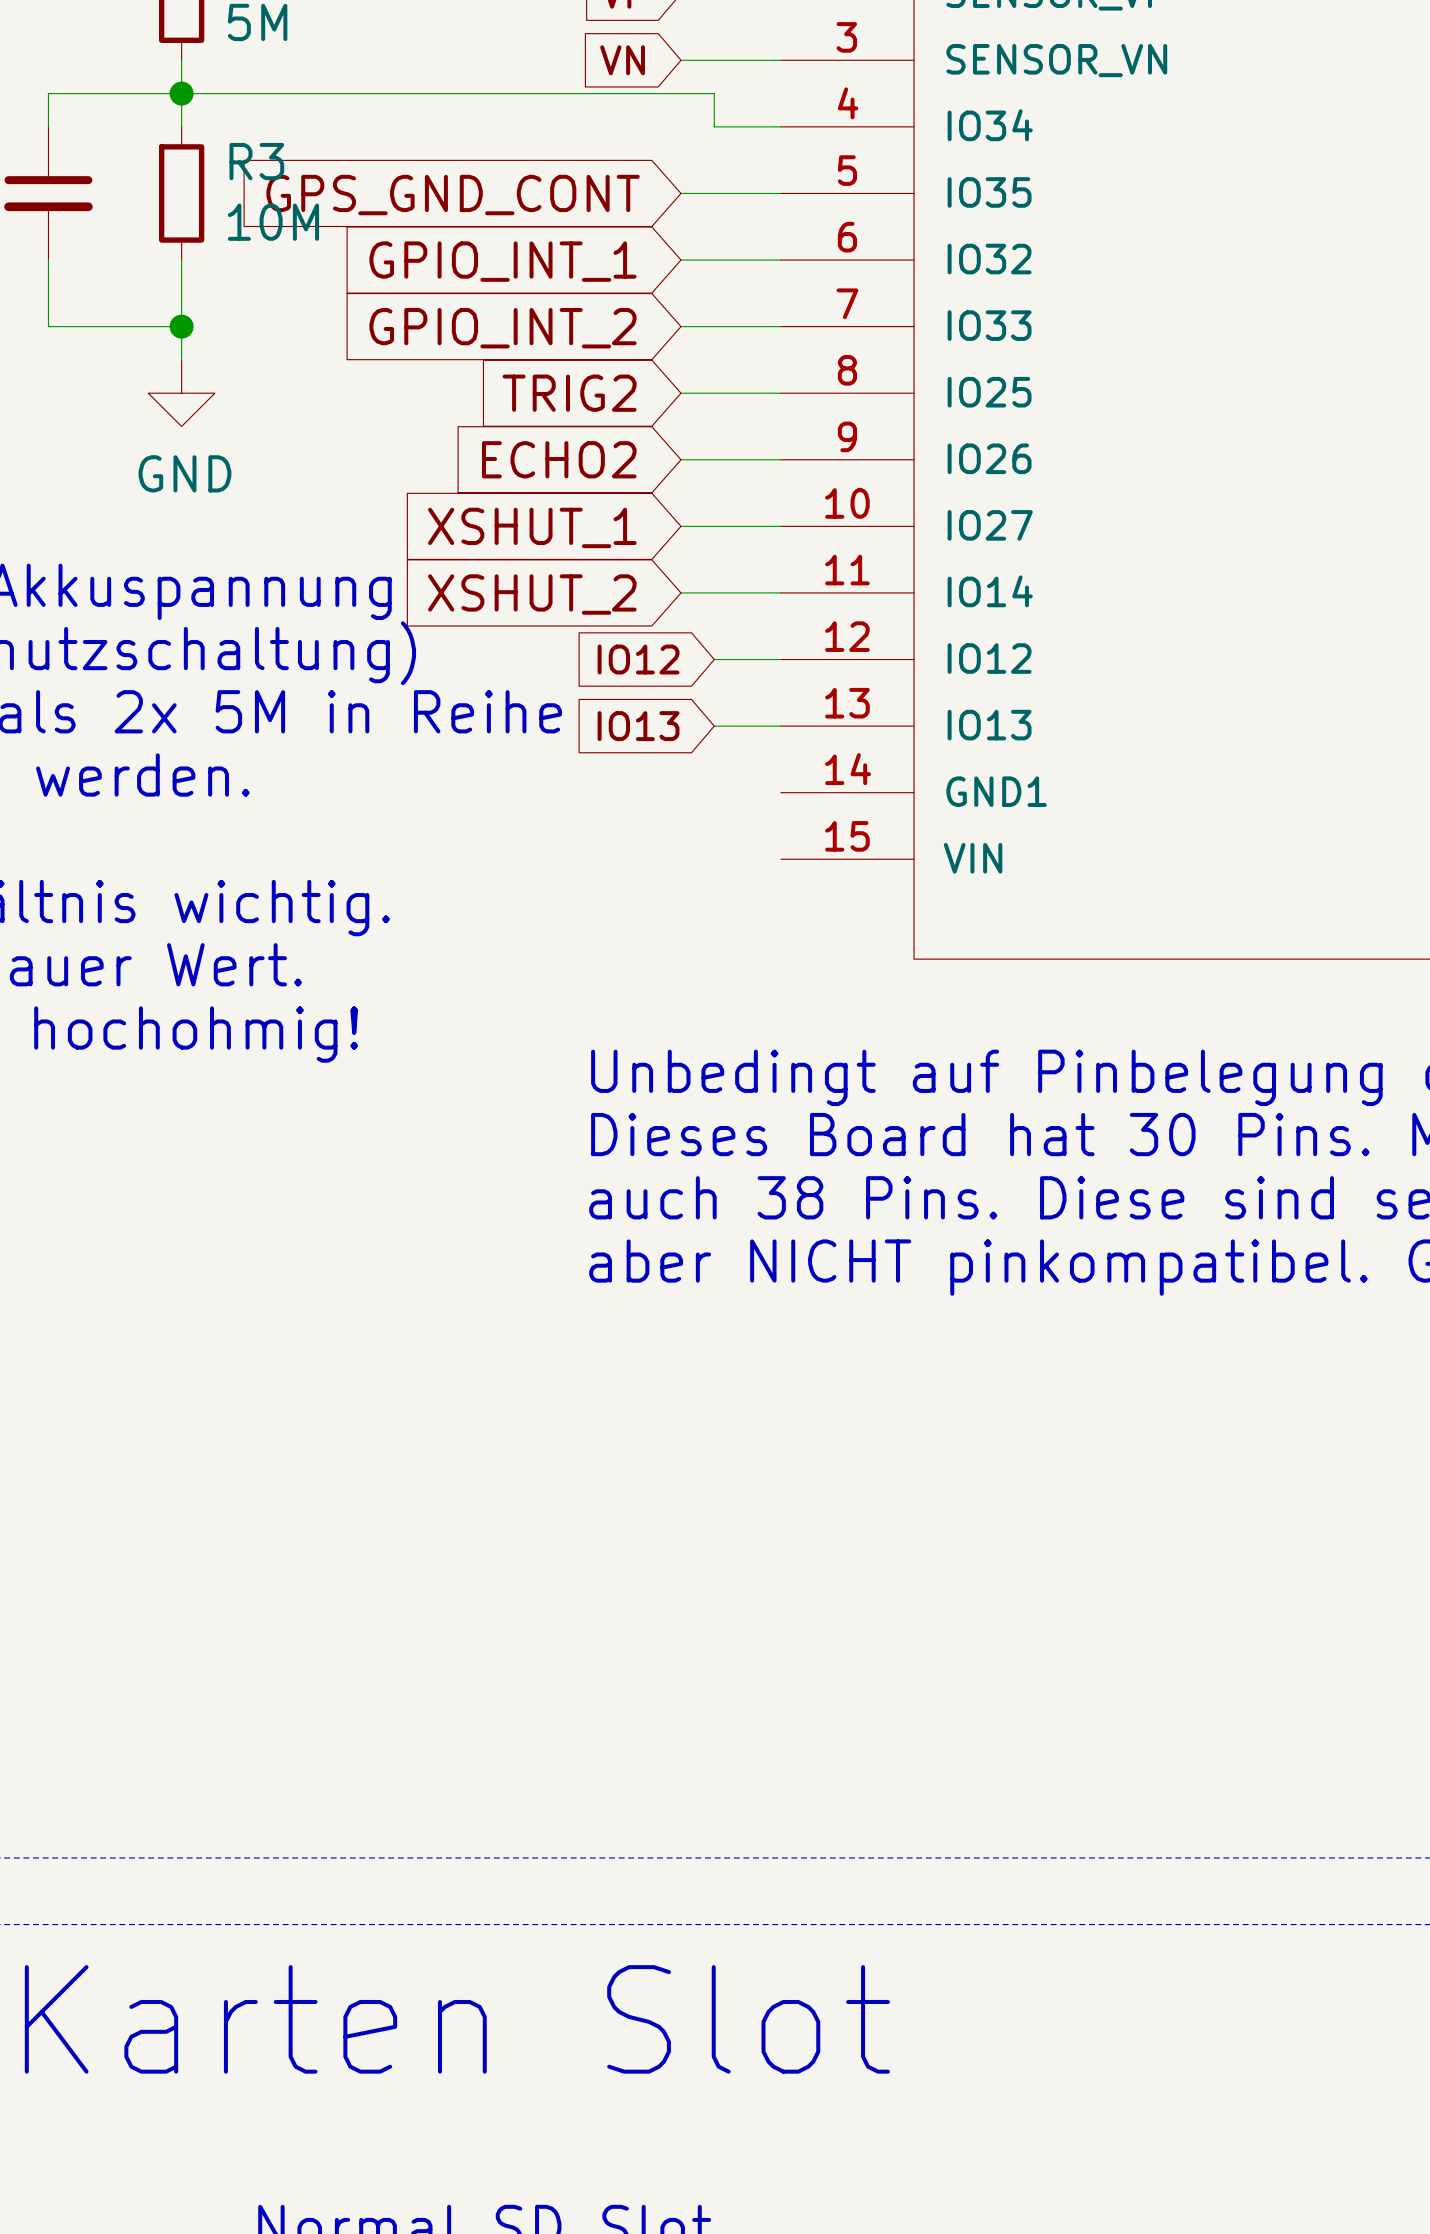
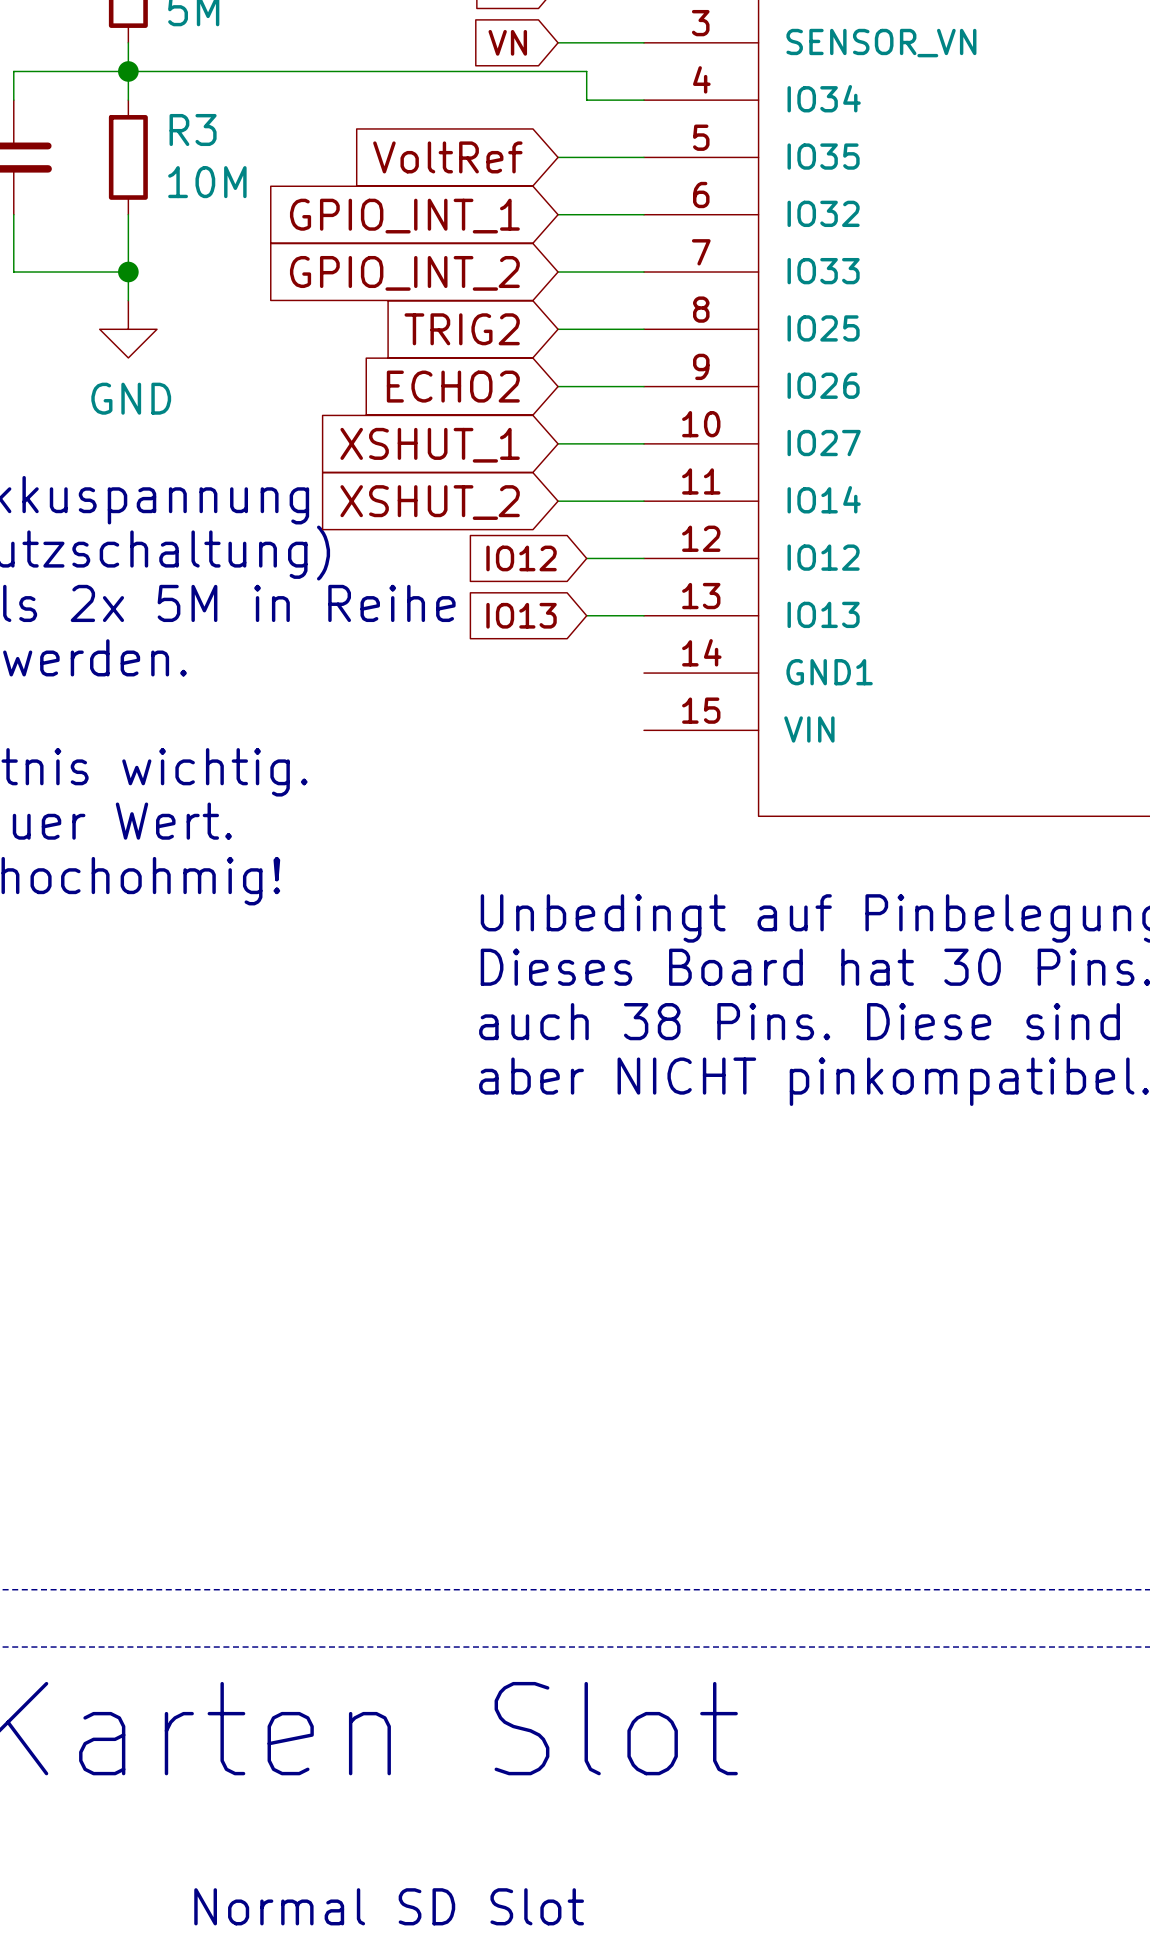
global label: GPS_GND_CONT (453, 195) -> VoltRef (447, 157)

